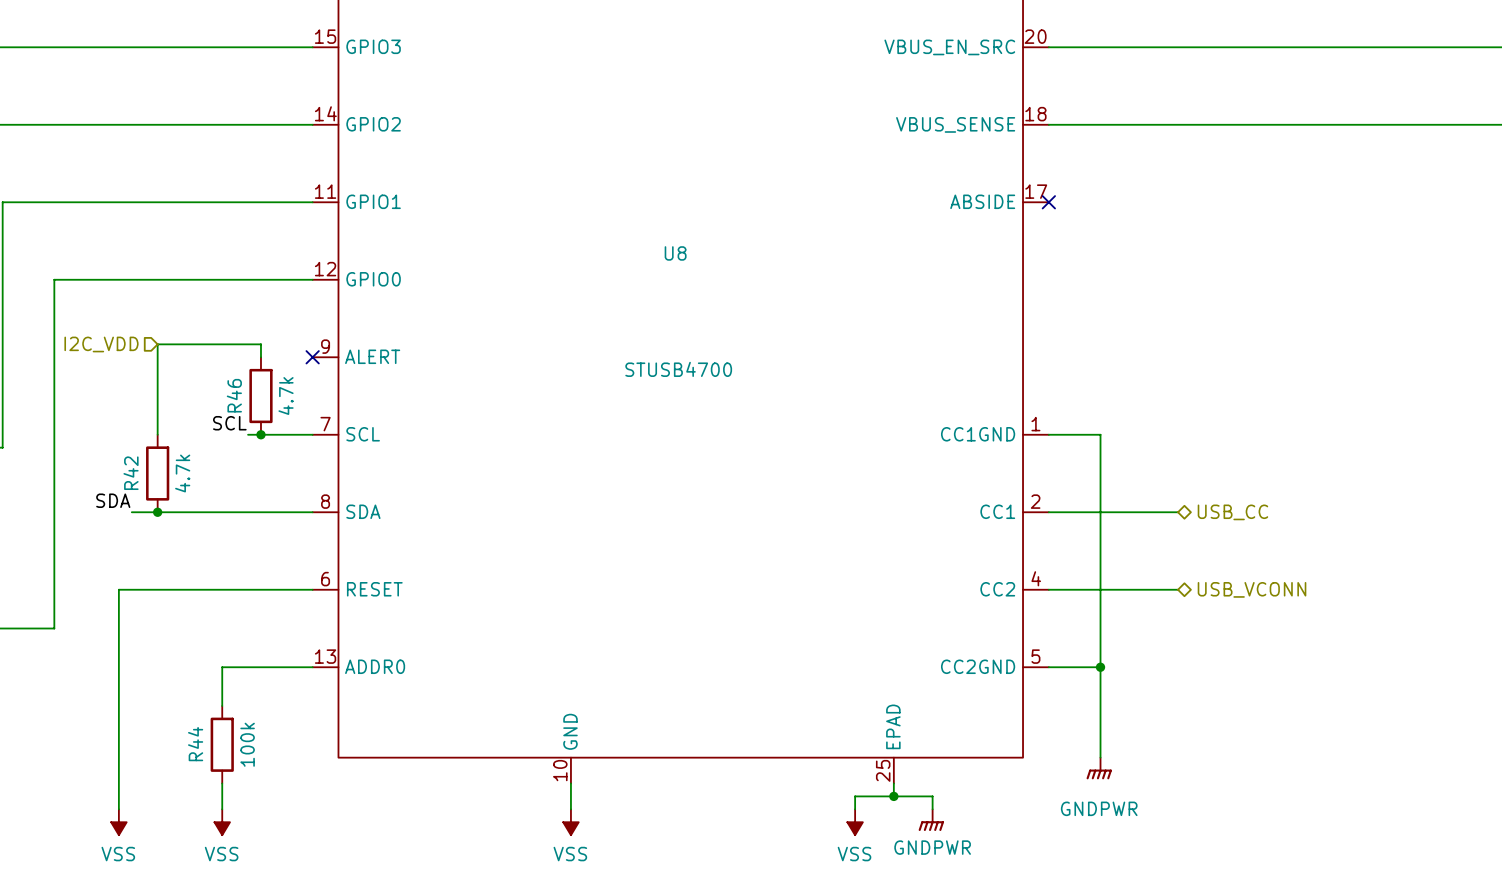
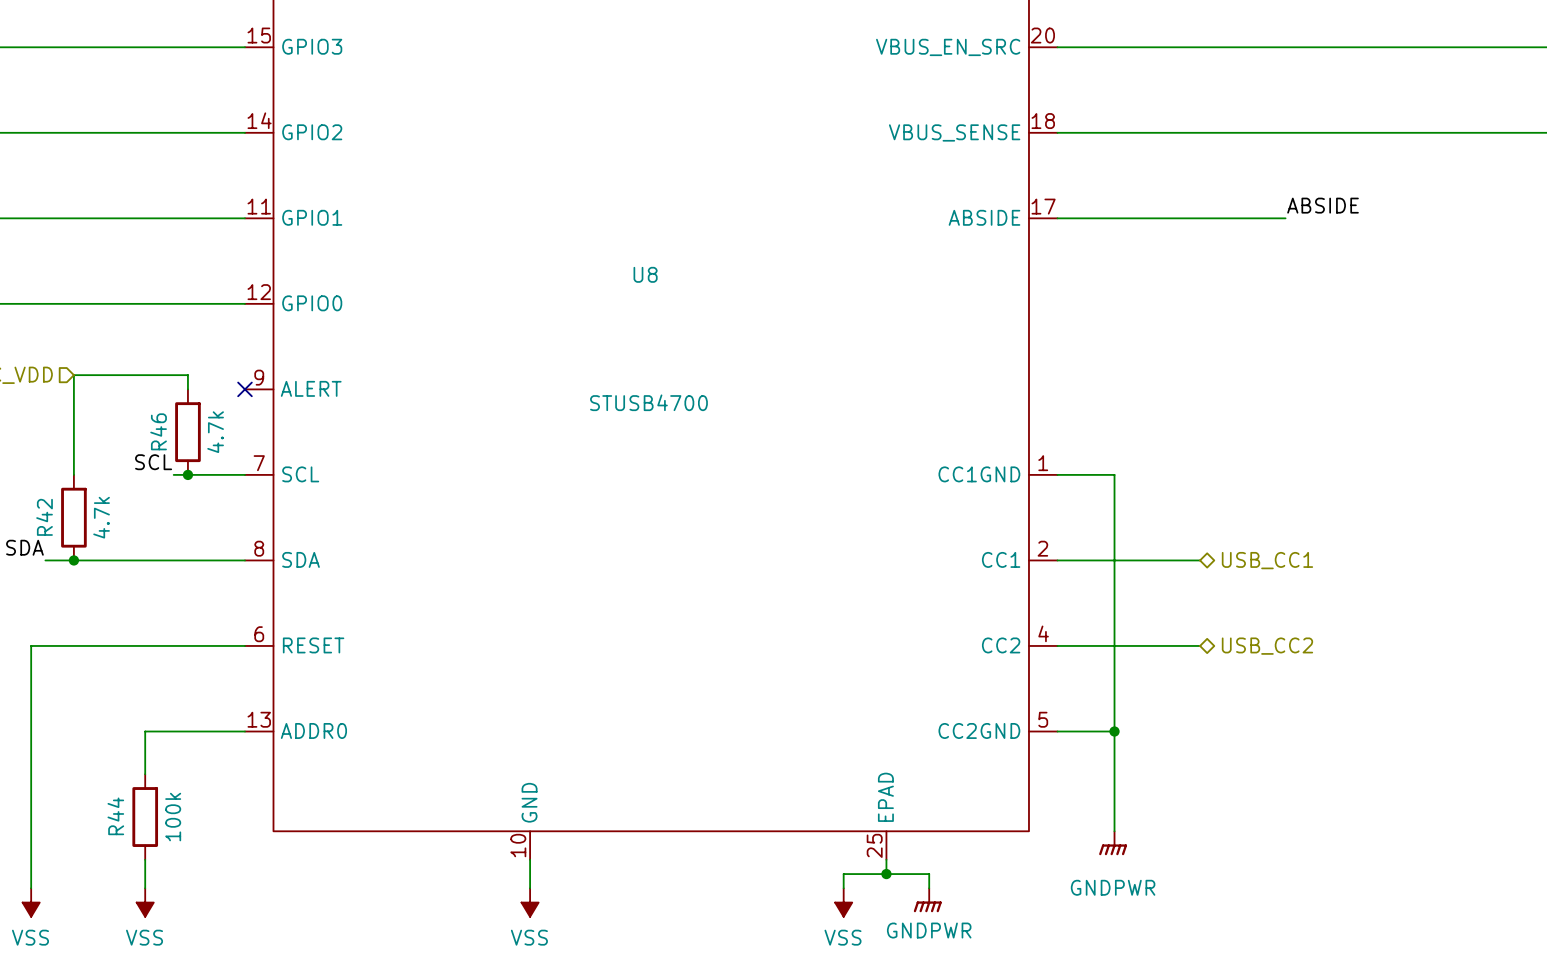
label: none -> ABSIDE (1323, 205)
wire: none -> (1057, 218) (1285, 218)
no-connect mark: (1048, 202) -> none
hierarchical label: USB_CC (1232, 512) -> USB_CC1 (1267, 560)
hierarchical label: USB_VCONN (1252, 589) -> USB_CC2 (1267, 646)

